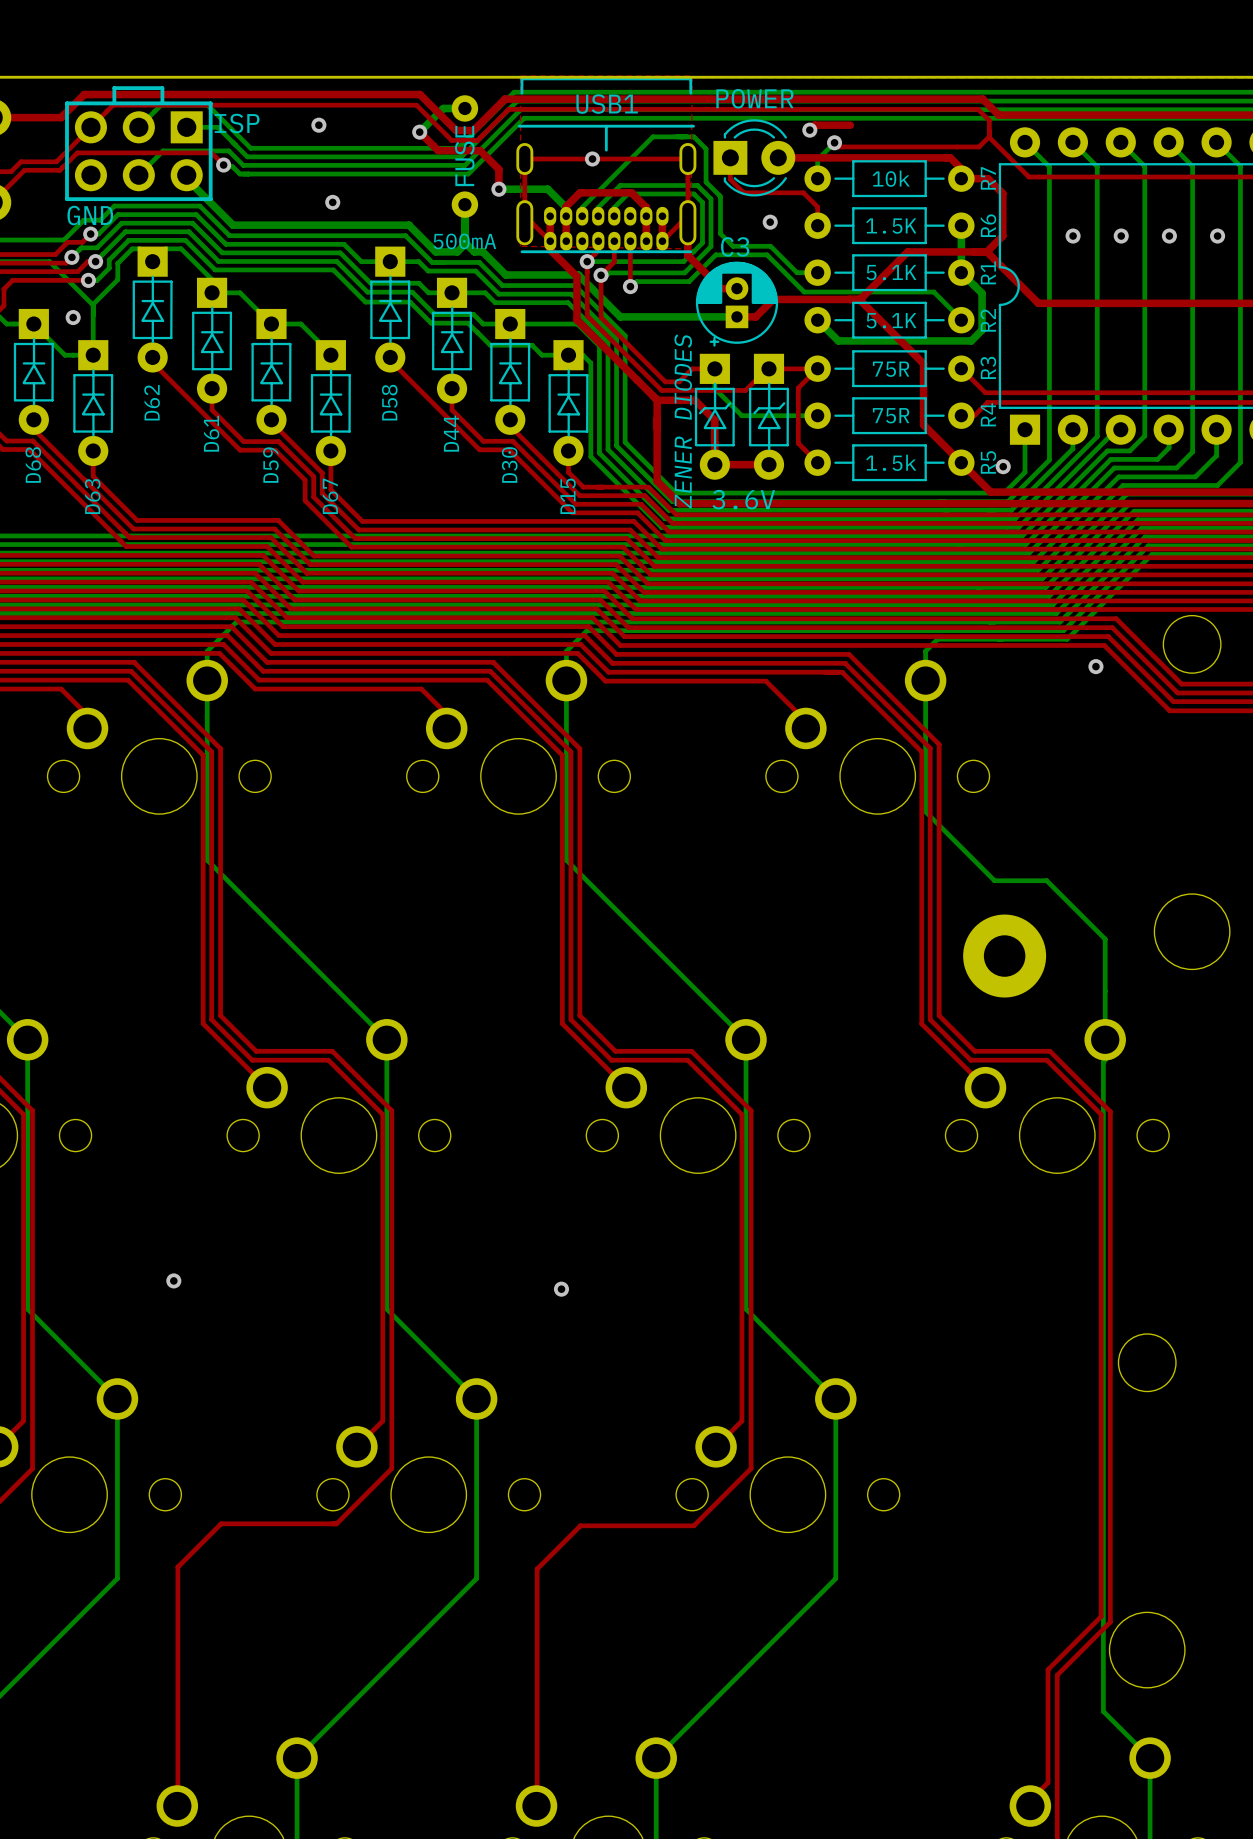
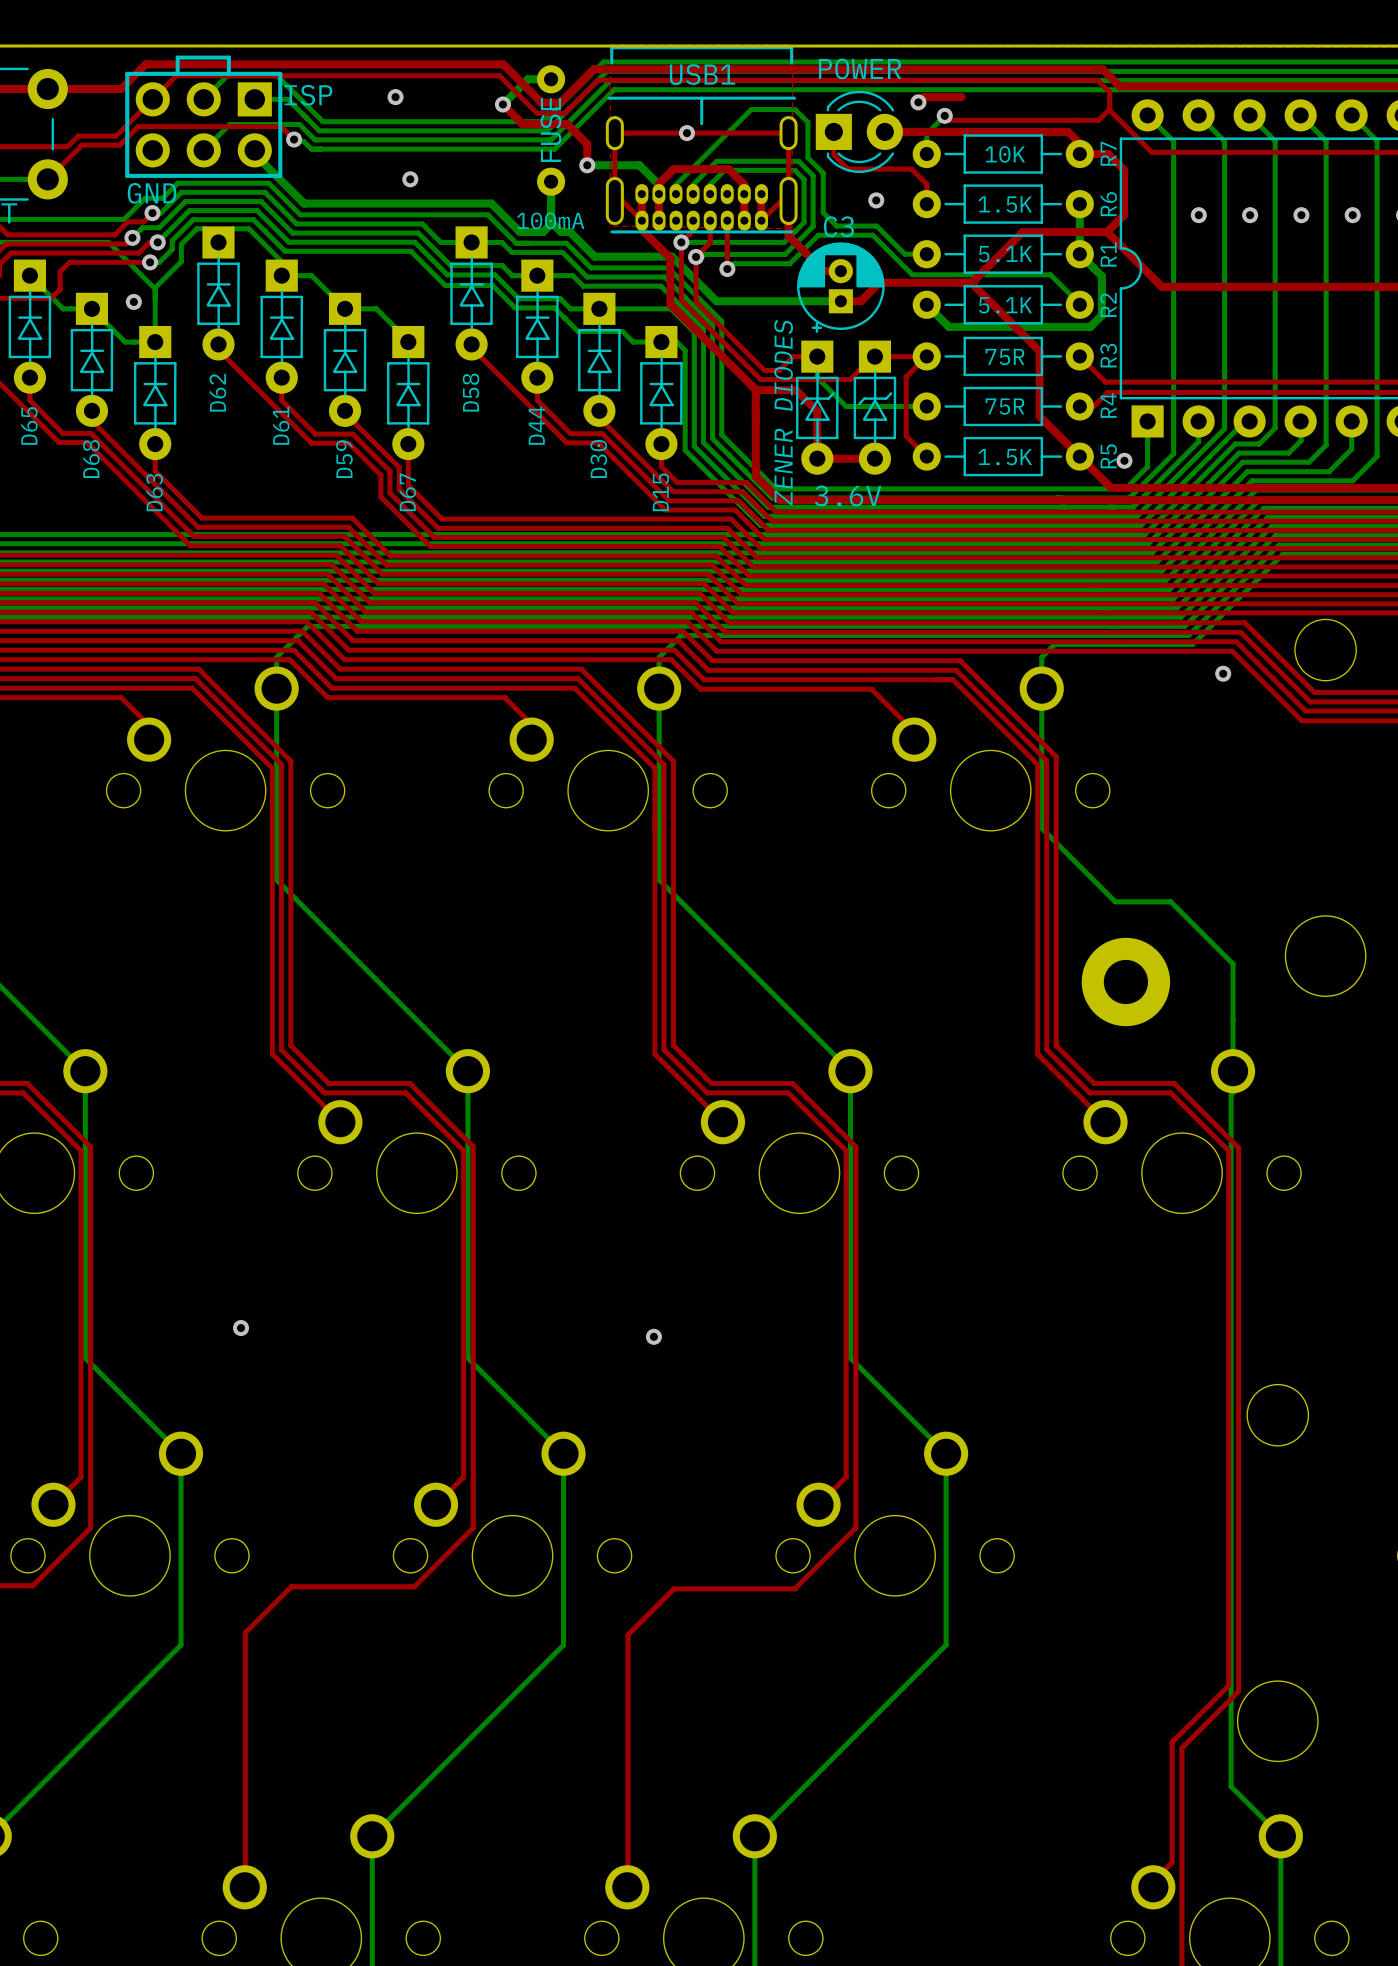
R7 value: 10k (891, 178) -> 10K (1005, 154)
text: 500mA (464, 241) -> 100mA (550, 220)
R5 value: 1.5k (891, 462) -> 1.5K (1005, 457)

